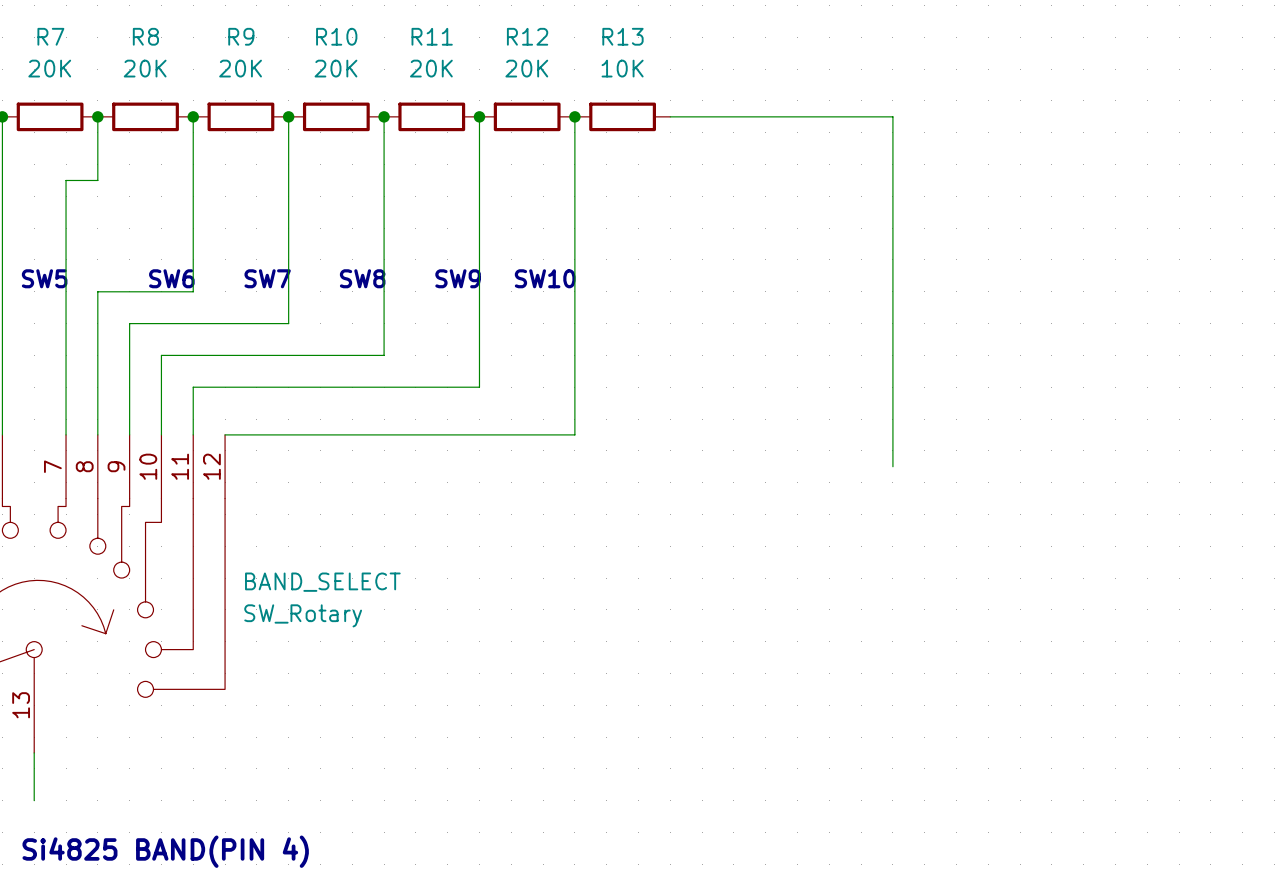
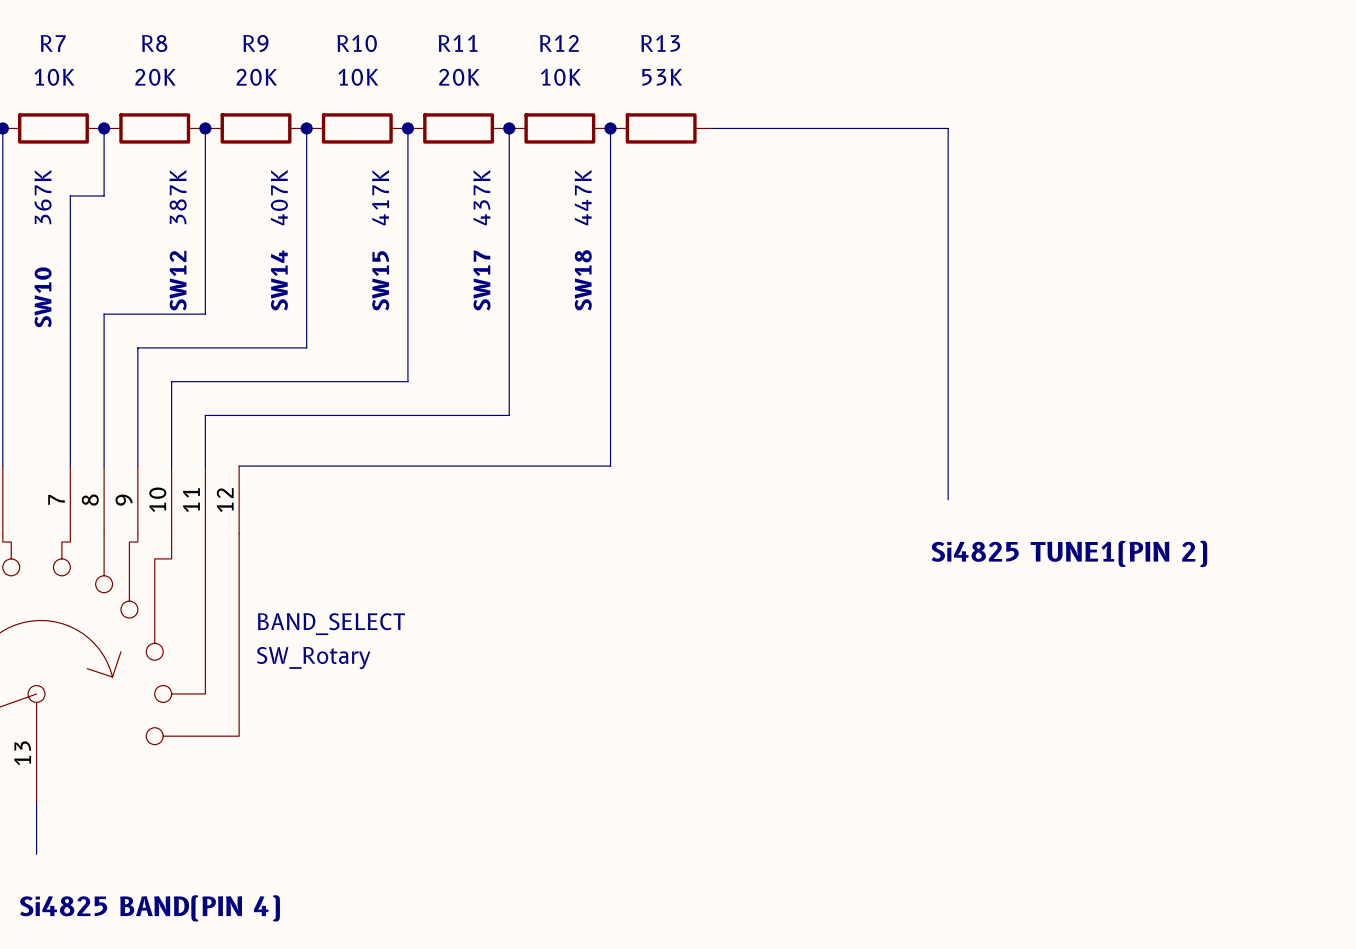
R7 value: 20K (49, 68) -> 10K (54, 77)
R10 value: 20K (335, 68) -> 10K (358, 77)
R12 value: 20K (526, 68) -> 10K (560, 77)
R13 value: 10K (622, 68) -> 53K (662, 77)
text: none -> 367K (43, 197)
text: none -> 387K (178, 197)
text: none -> 407K (279, 197)
text: none -> 417K (380, 197)
text: none -> 437K (481, 197)
text: none -> 447K (583, 197)
text: none -> SW12 (178, 280)
text: none -> SW14 (279, 280)
text: none -> SW15 (380, 280)
text: none -> SW17 (481, 280)
text: none -> SW10 (43, 297)
text: SW5 (44, 278) -> none
text: SW6 (171, 278) -> none
text: SW7 (267, 278) -> none
text: SW8 (362, 278) -> none
text: SW9 (458, 278) -> none
text: SW10 (545, 278) -> SW18 (583, 280)
text: none -> Si4825 TUNE1(PIN 2) (1069, 553)

